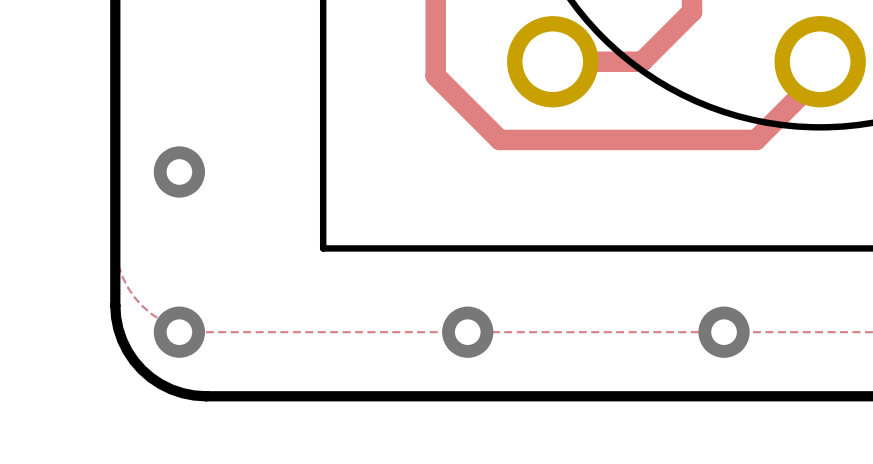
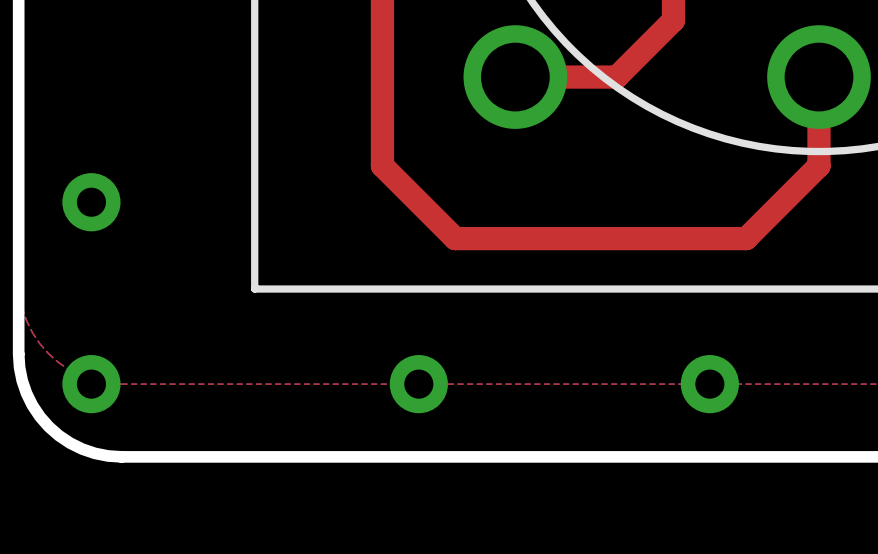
top track: (435, 75) (499, 139) (756, 139) (820, 75) -> (382, 93) (382, 165) (455, 238) (746, 238) (818, 165) (818, 93)

